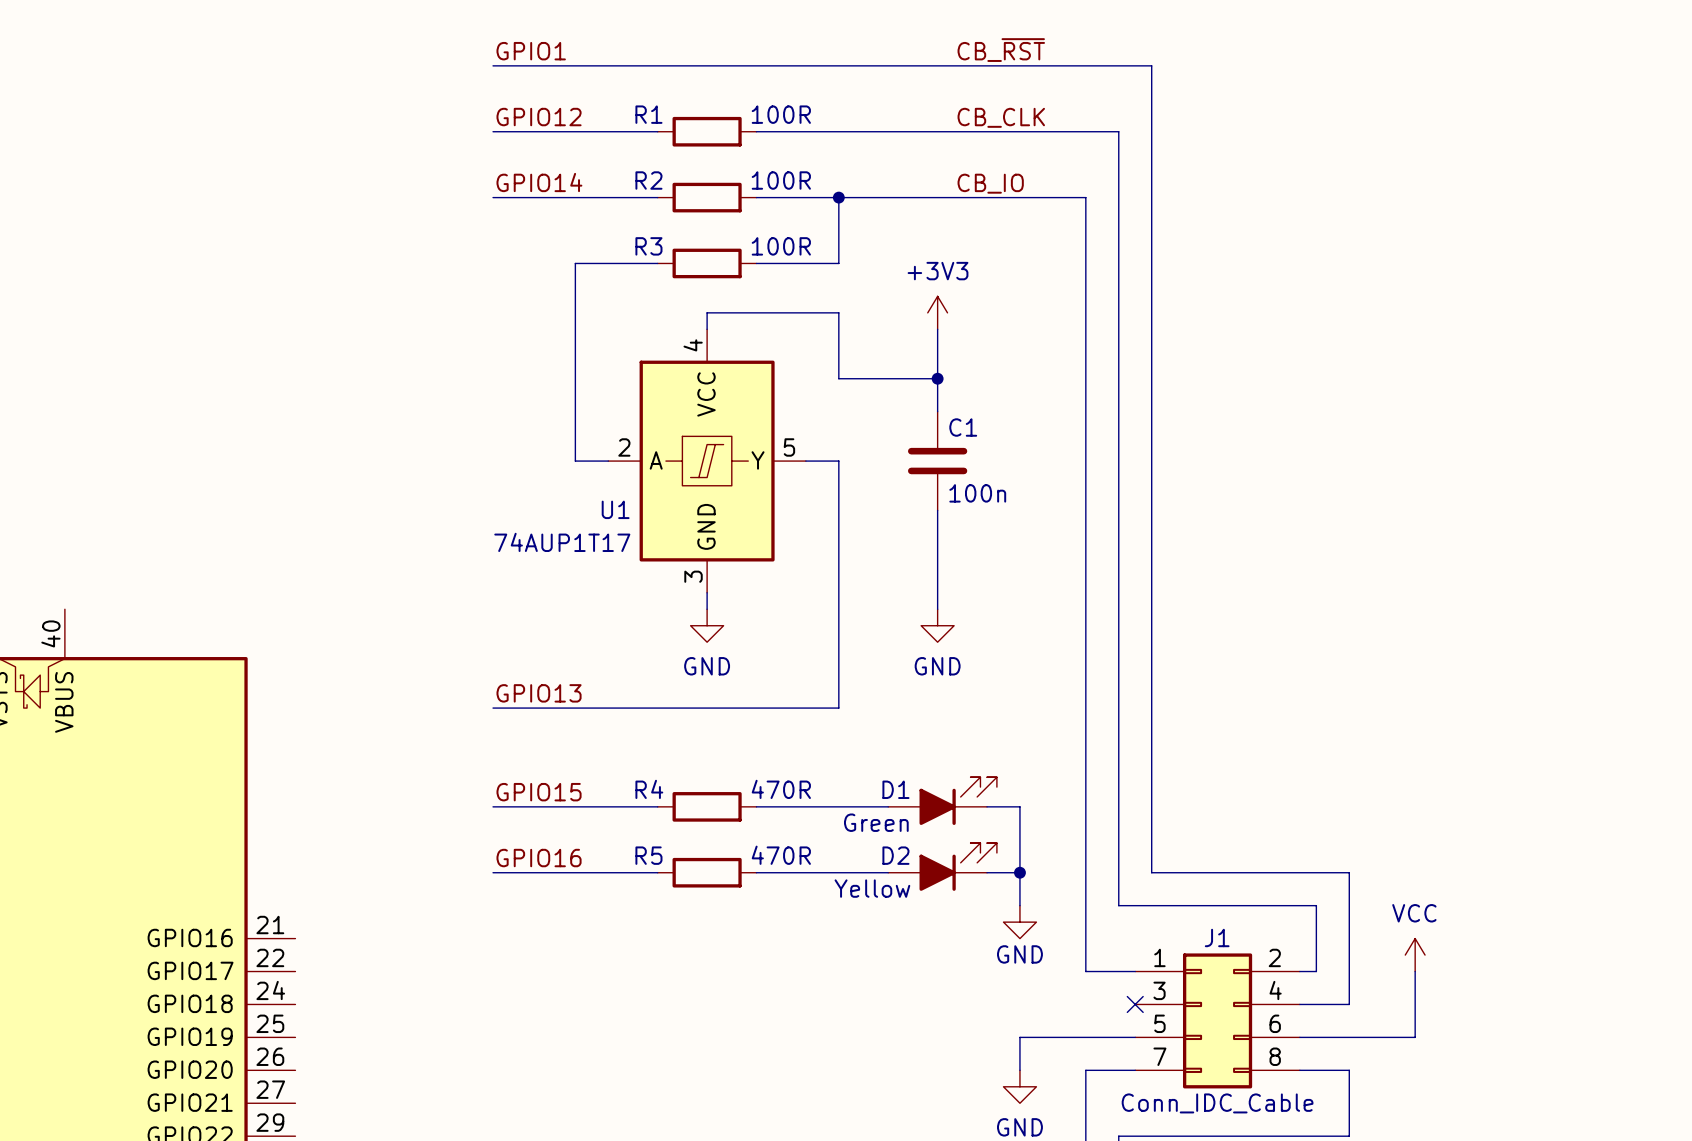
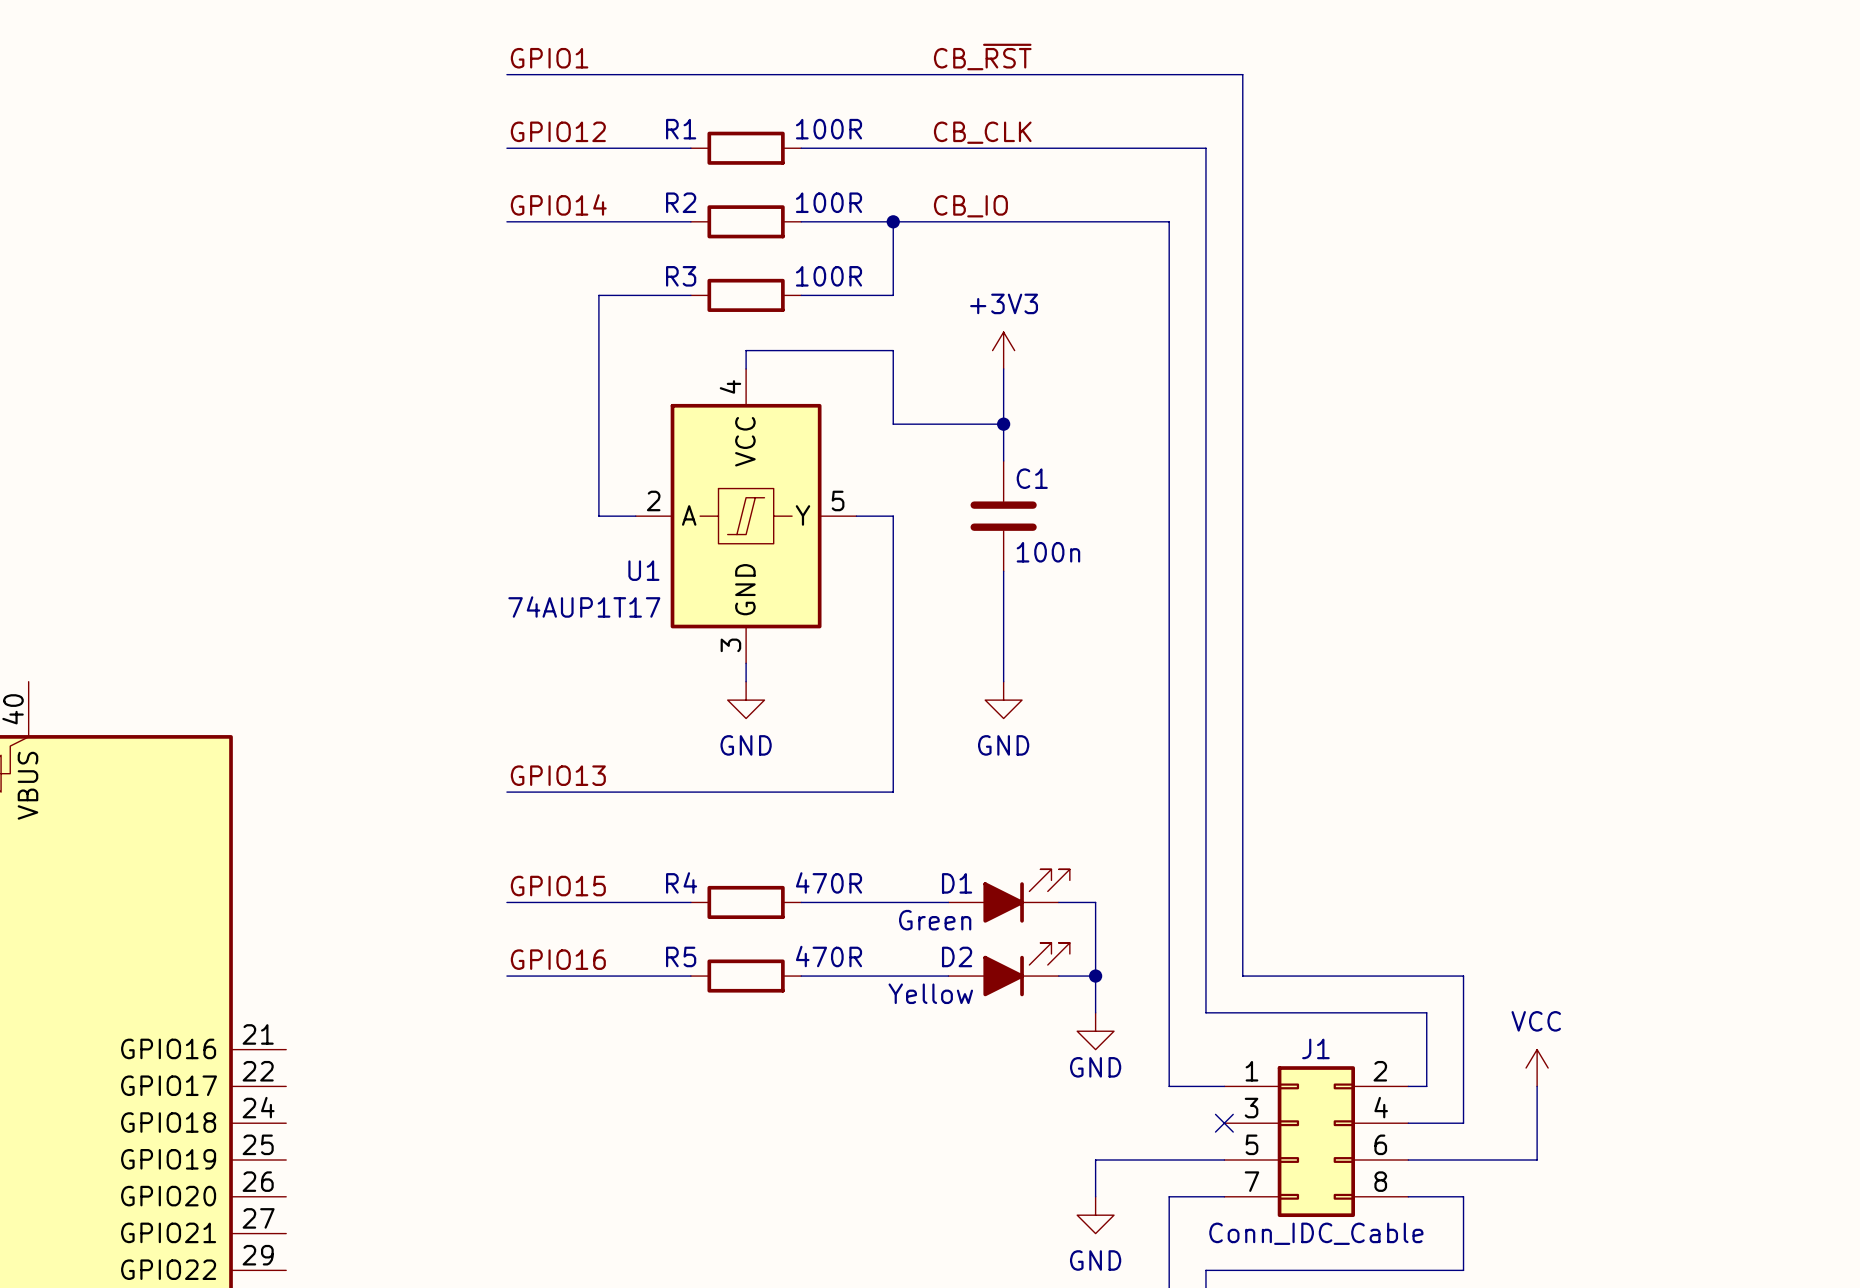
label position: CB_~{RST} (1001, 50) -> CB_~{RST} (982, 57)
label position: CB_CLK (1001, 117) -> CB_CLK (982, 132)
label position: CB_IO (990, 183) -> CB_IO (970, 206)

